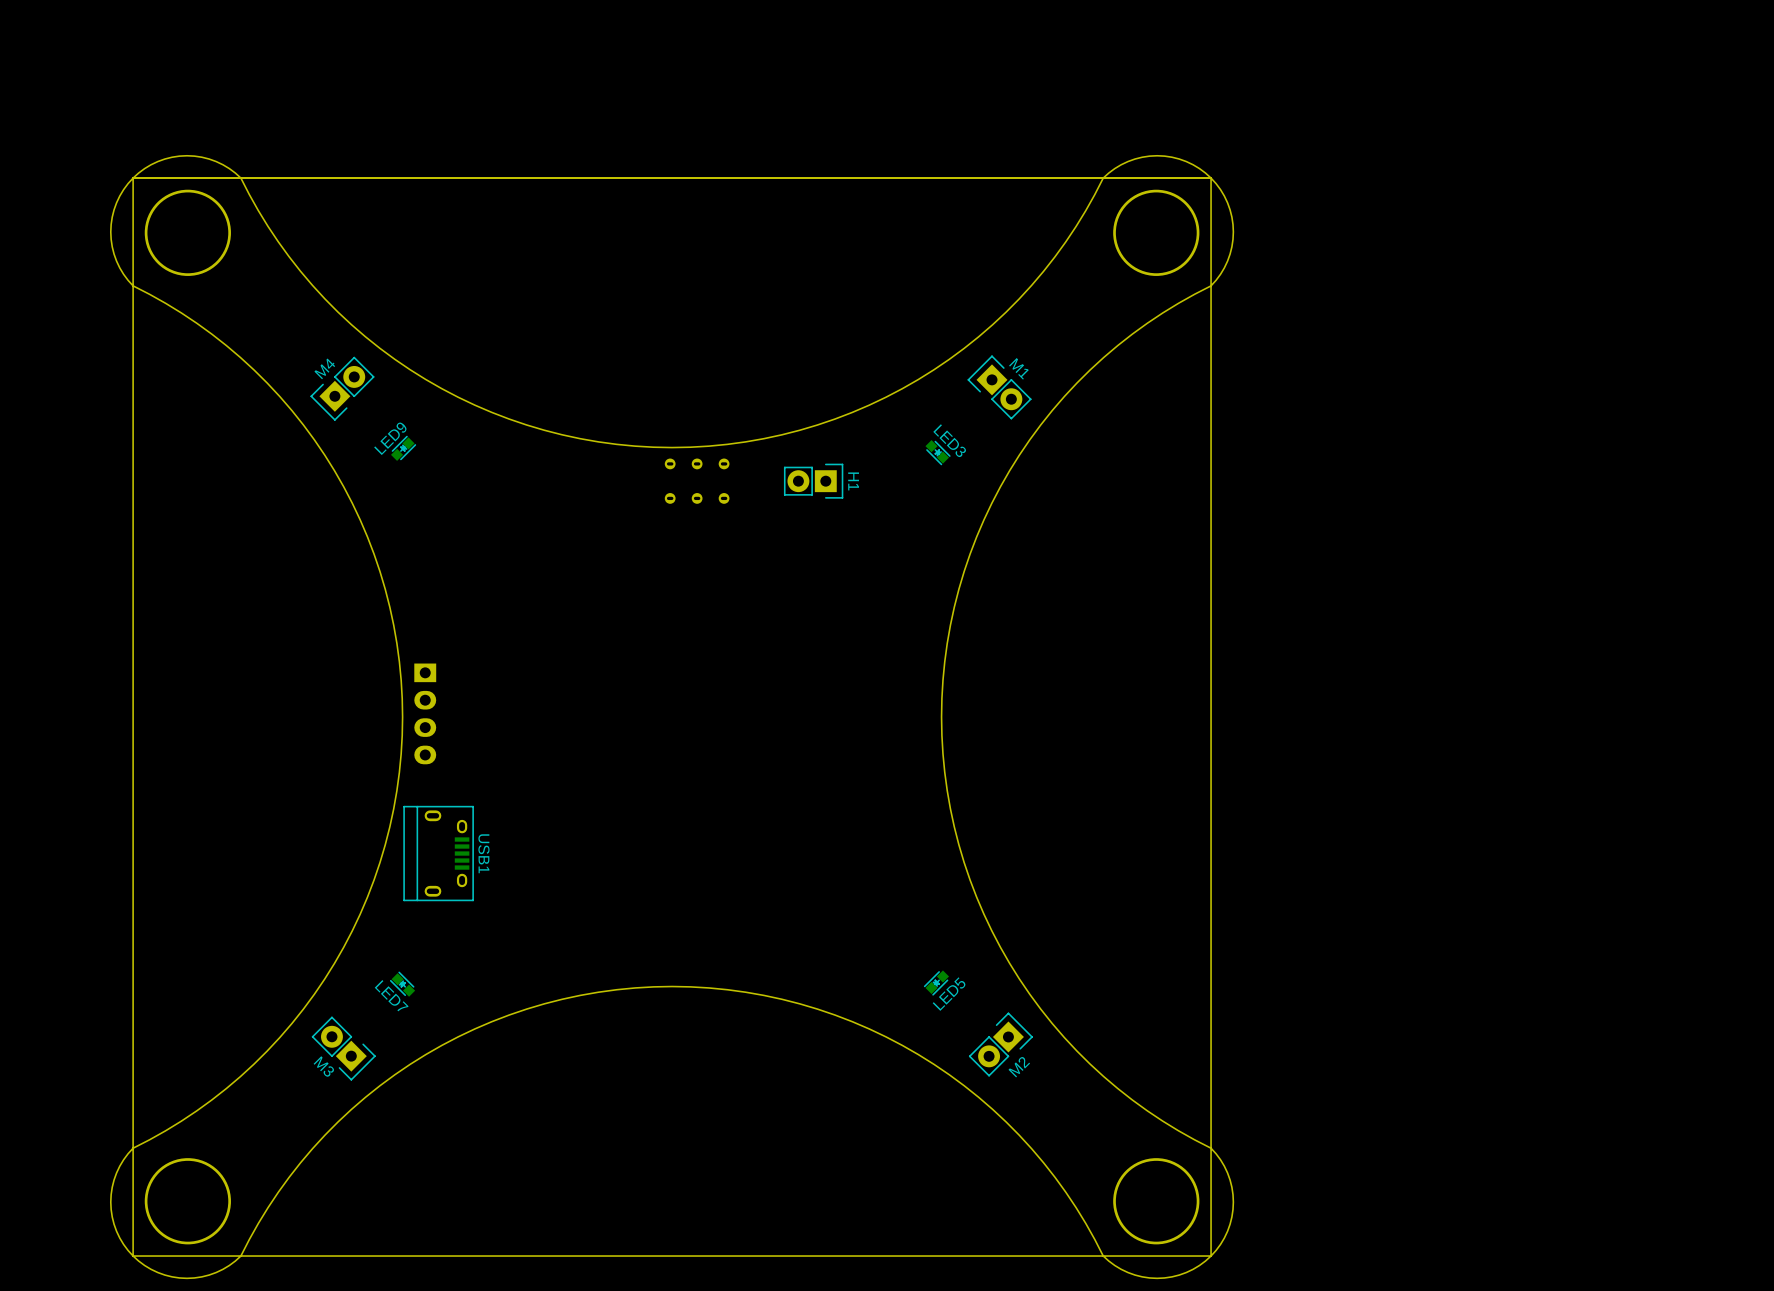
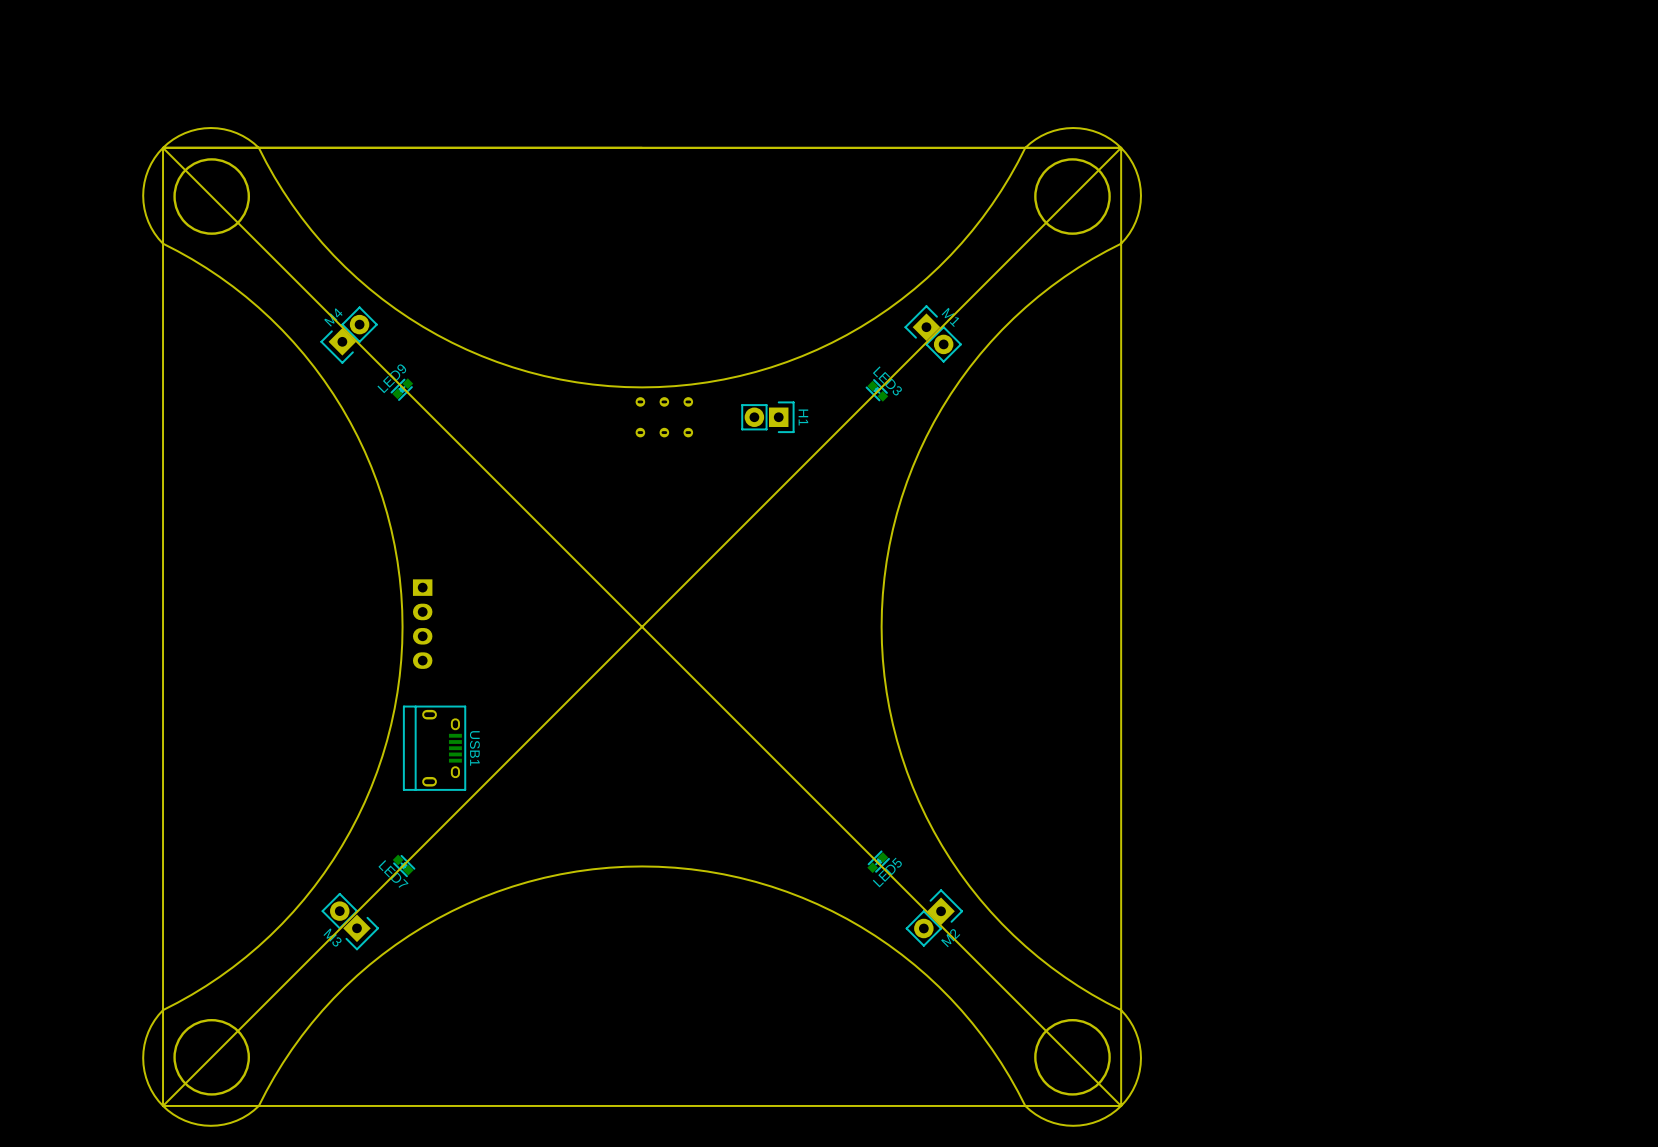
board edge: none -> (163, 147) (1121, 1105)
board edge: none -> (1121, 147) (163, 1105)
LED9 rotation: 0° (403, 448) -> 180° (402, 389)
LED3 rotation: 0° (938, 452) -> 180° (877, 390)
LED5 rotation: 0° (936, 983) -> 180° (878, 861)
LED7 rotation: 0° (402, 984) -> 180° (403, 865)

